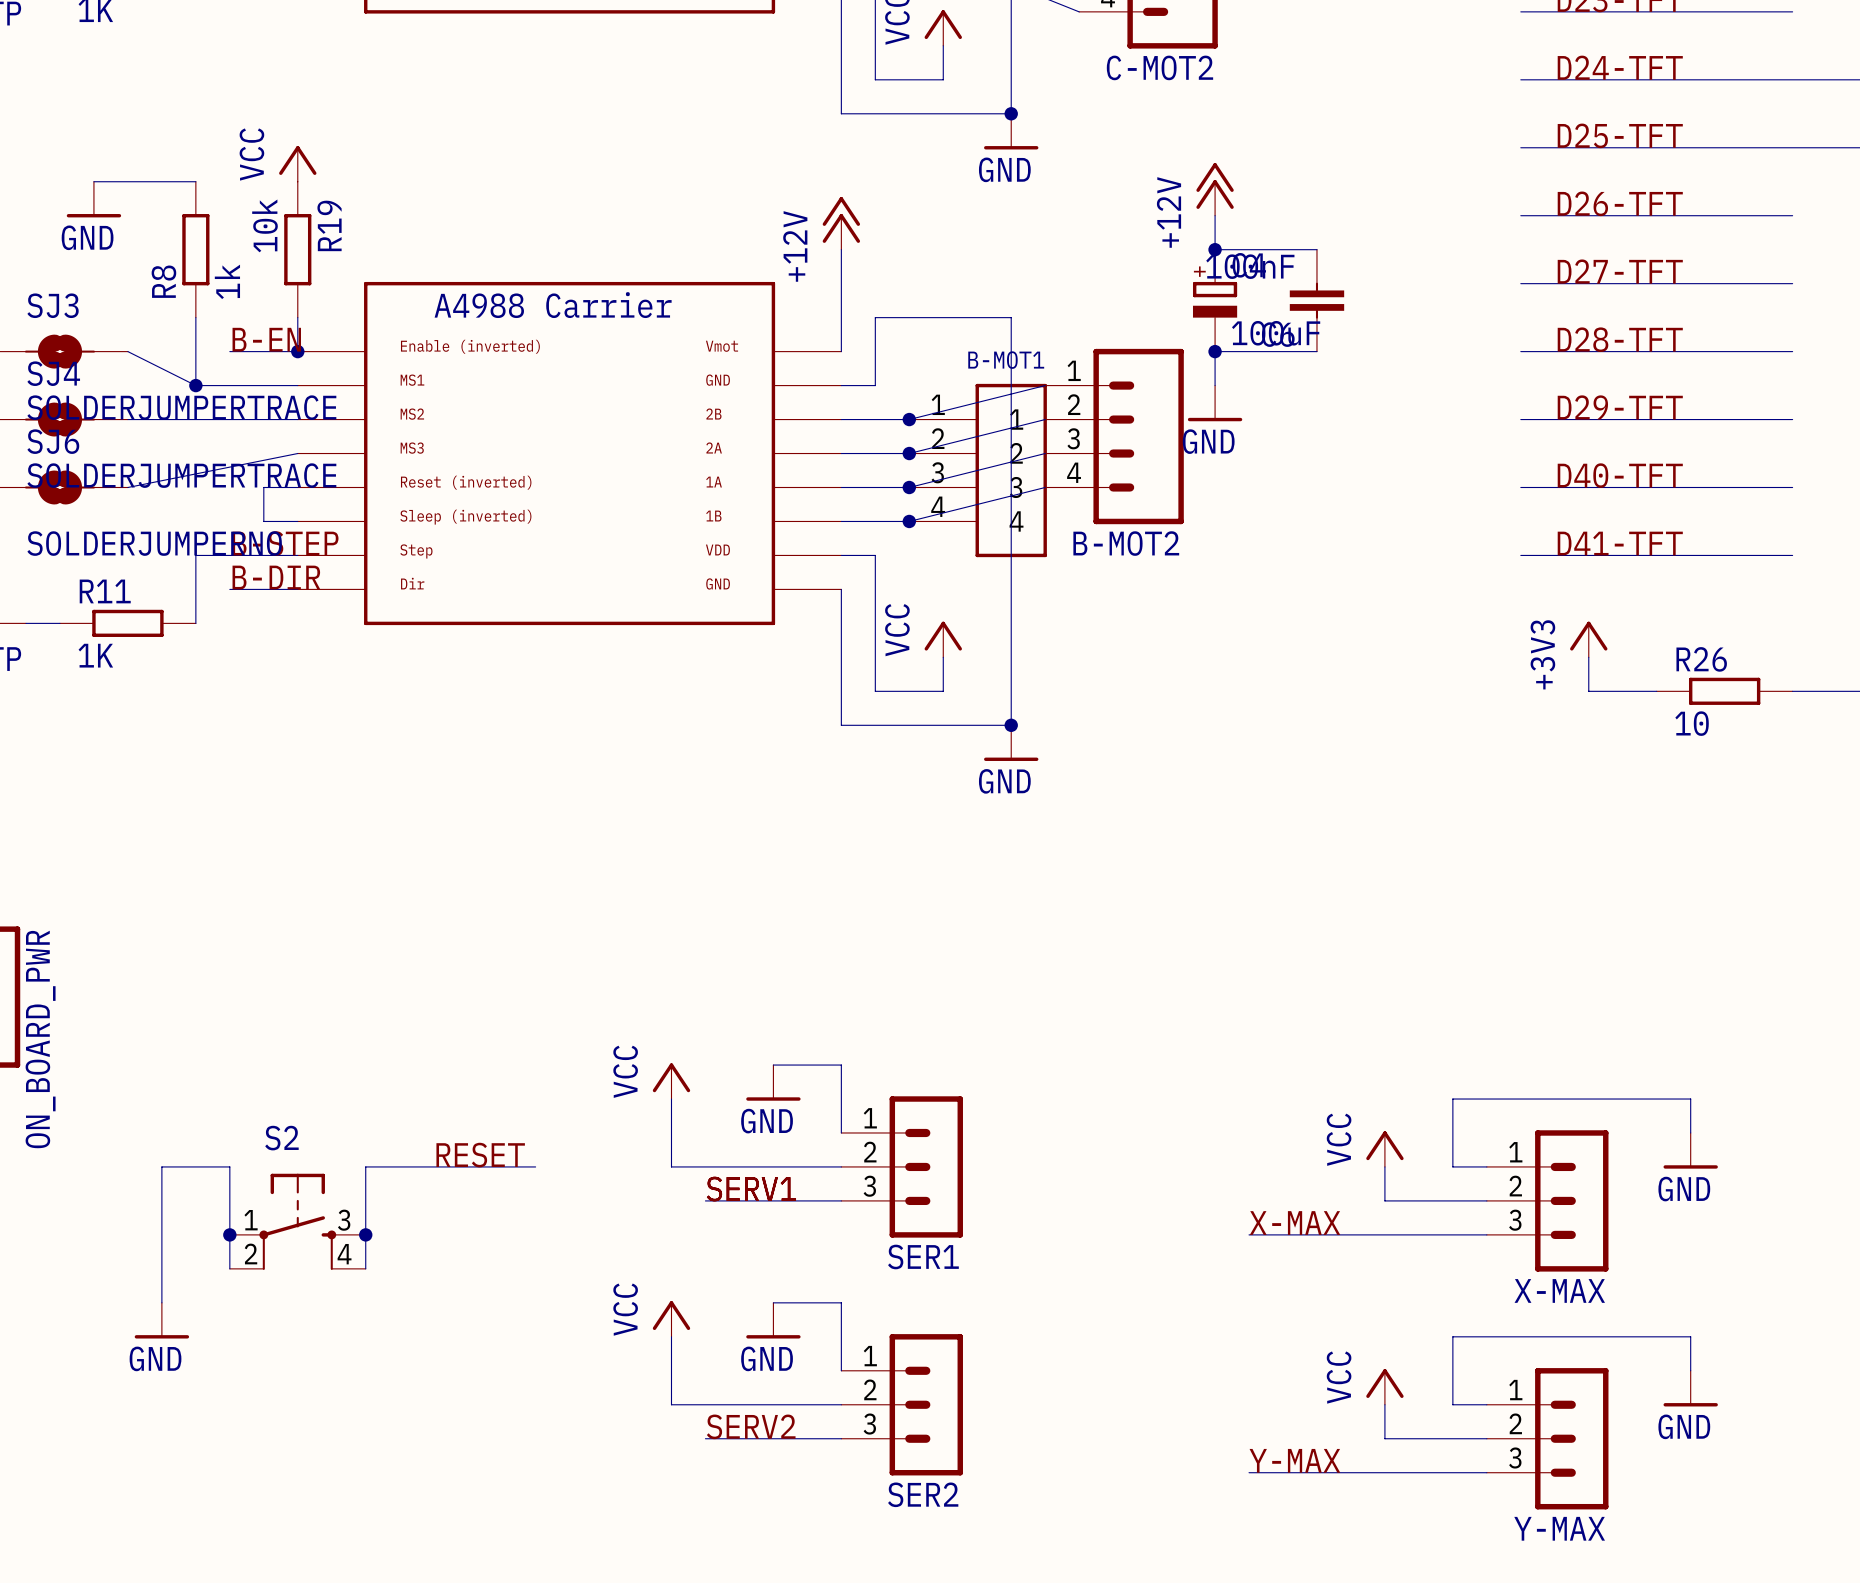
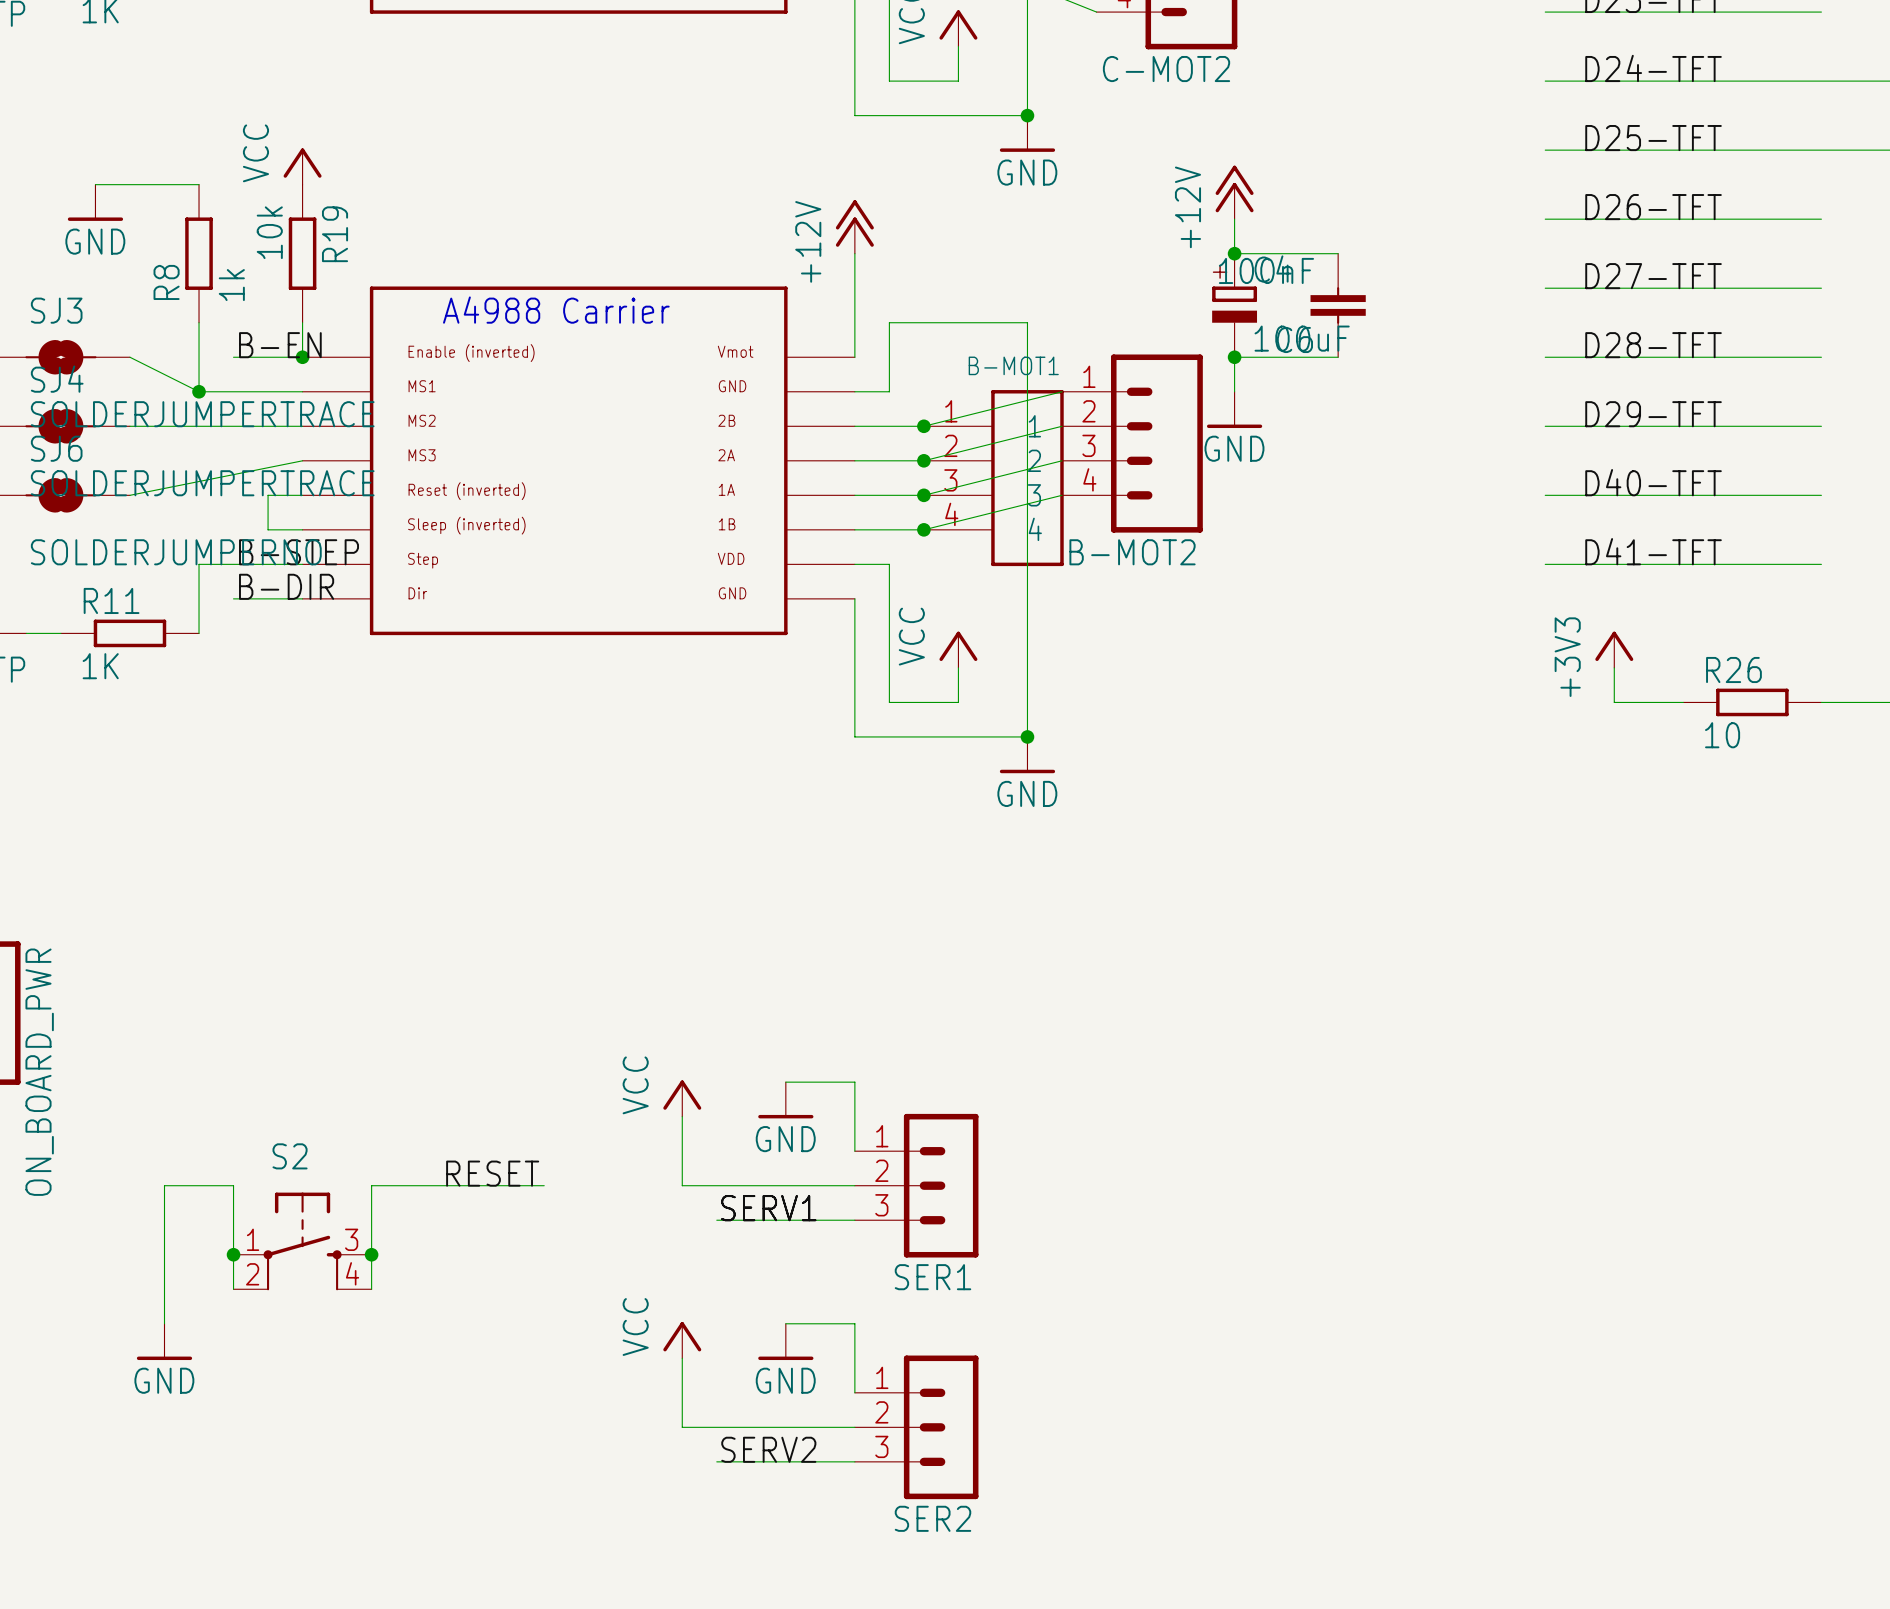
wire: (1690, 1132) (1690, 1099) (1452, 1099) (1452, 1166) (1486, 1166) -> none
power symbol: VCC (1384, 1149) -> none
power symbol: GND (1690, 1150) -> none
wire: (1384, 1166) (1384, 1200) (1486, 1200) -> none
X-MAX: (1547, 1200) -> none
label: X-MAX (1295, 1223) -> none
wire: (1249, 1234) (1486, 1234) -> none
wire: (1690, 1370) (1690, 1336) (1452, 1336) (1452, 1404) (1486, 1404) -> none
power symbol: VCC (1384, 1386) -> none
power symbol: GND (1690, 1388) -> none
wire: (1384, 1404) (1384, 1438) (1486, 1438) -> none
Y-MAX: (1547, 1438) -> none
label: Y-MAX (1294, 1460) -> none
wire: (1249, 1472) (1486, 1472) -> none

